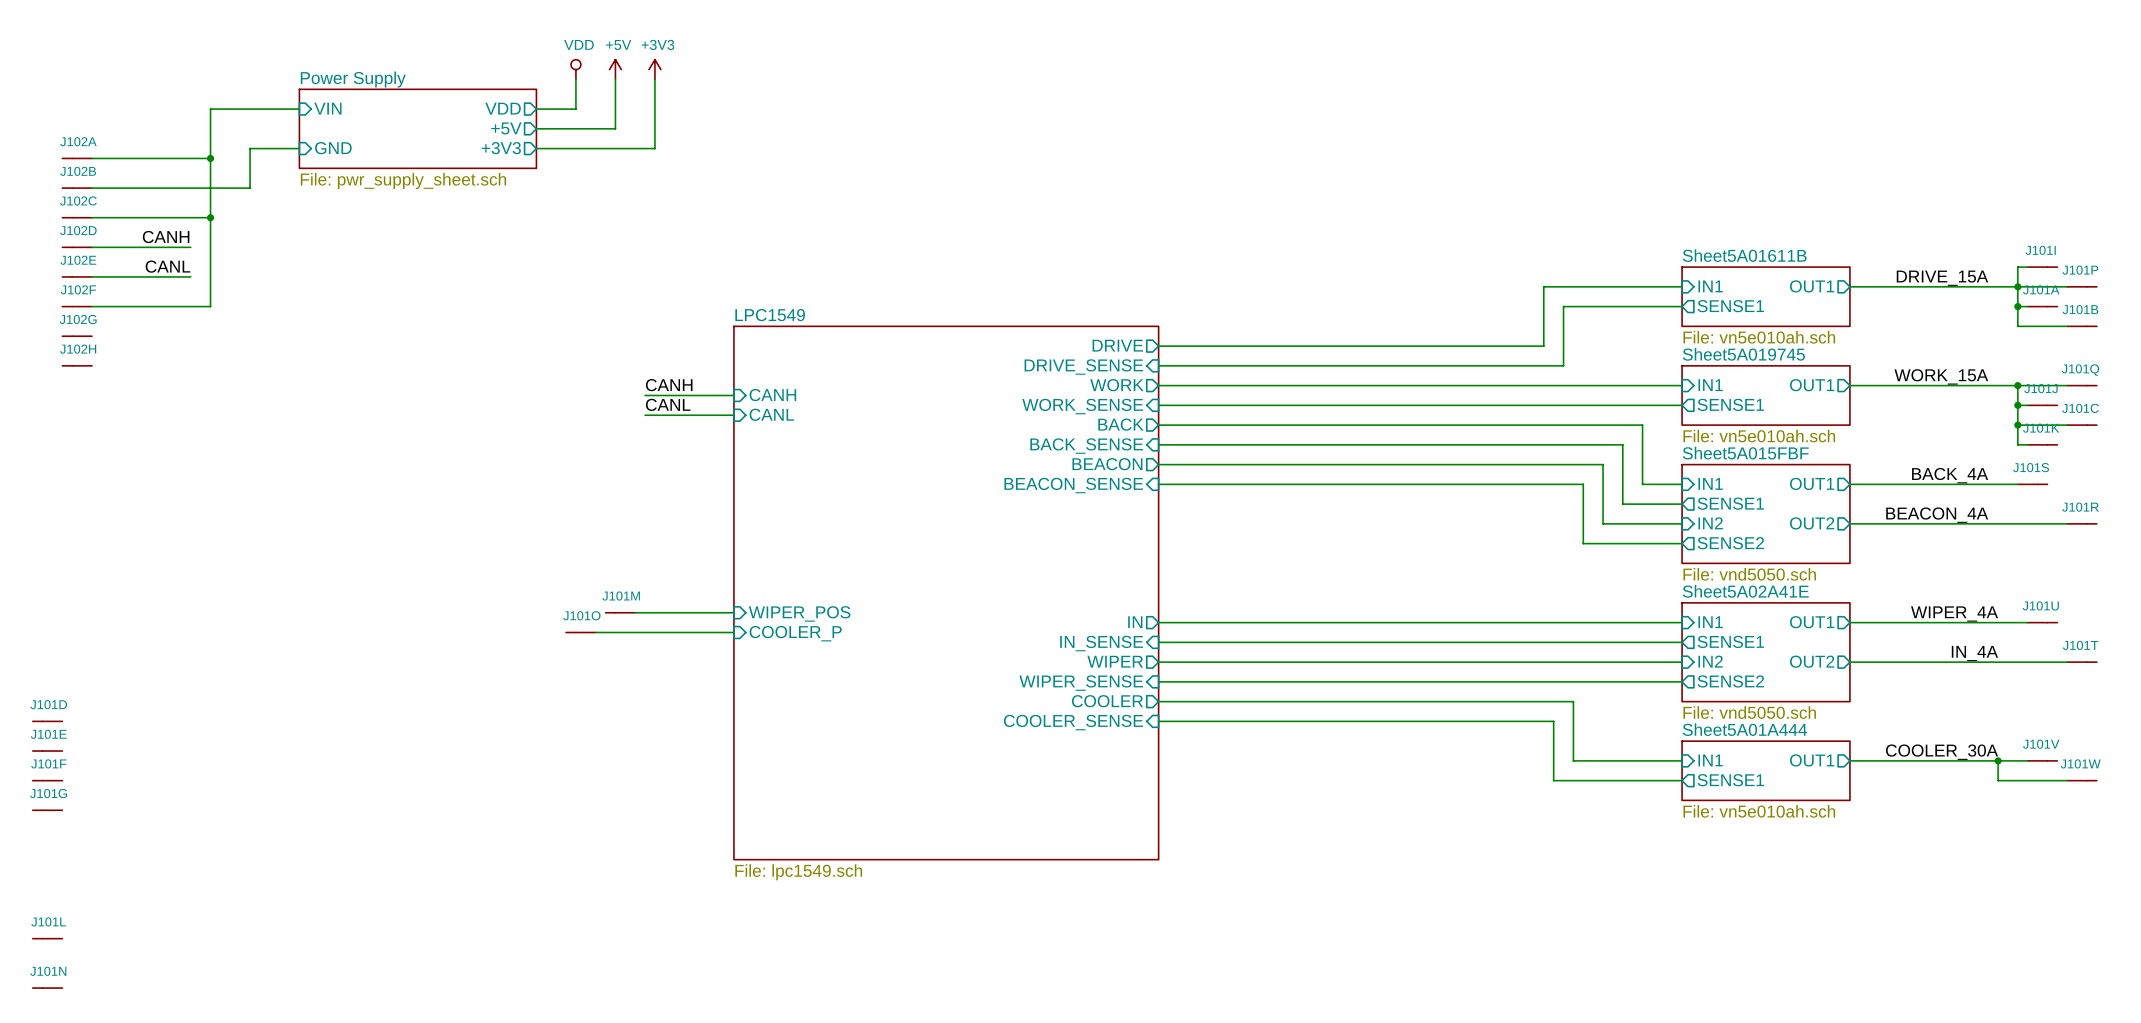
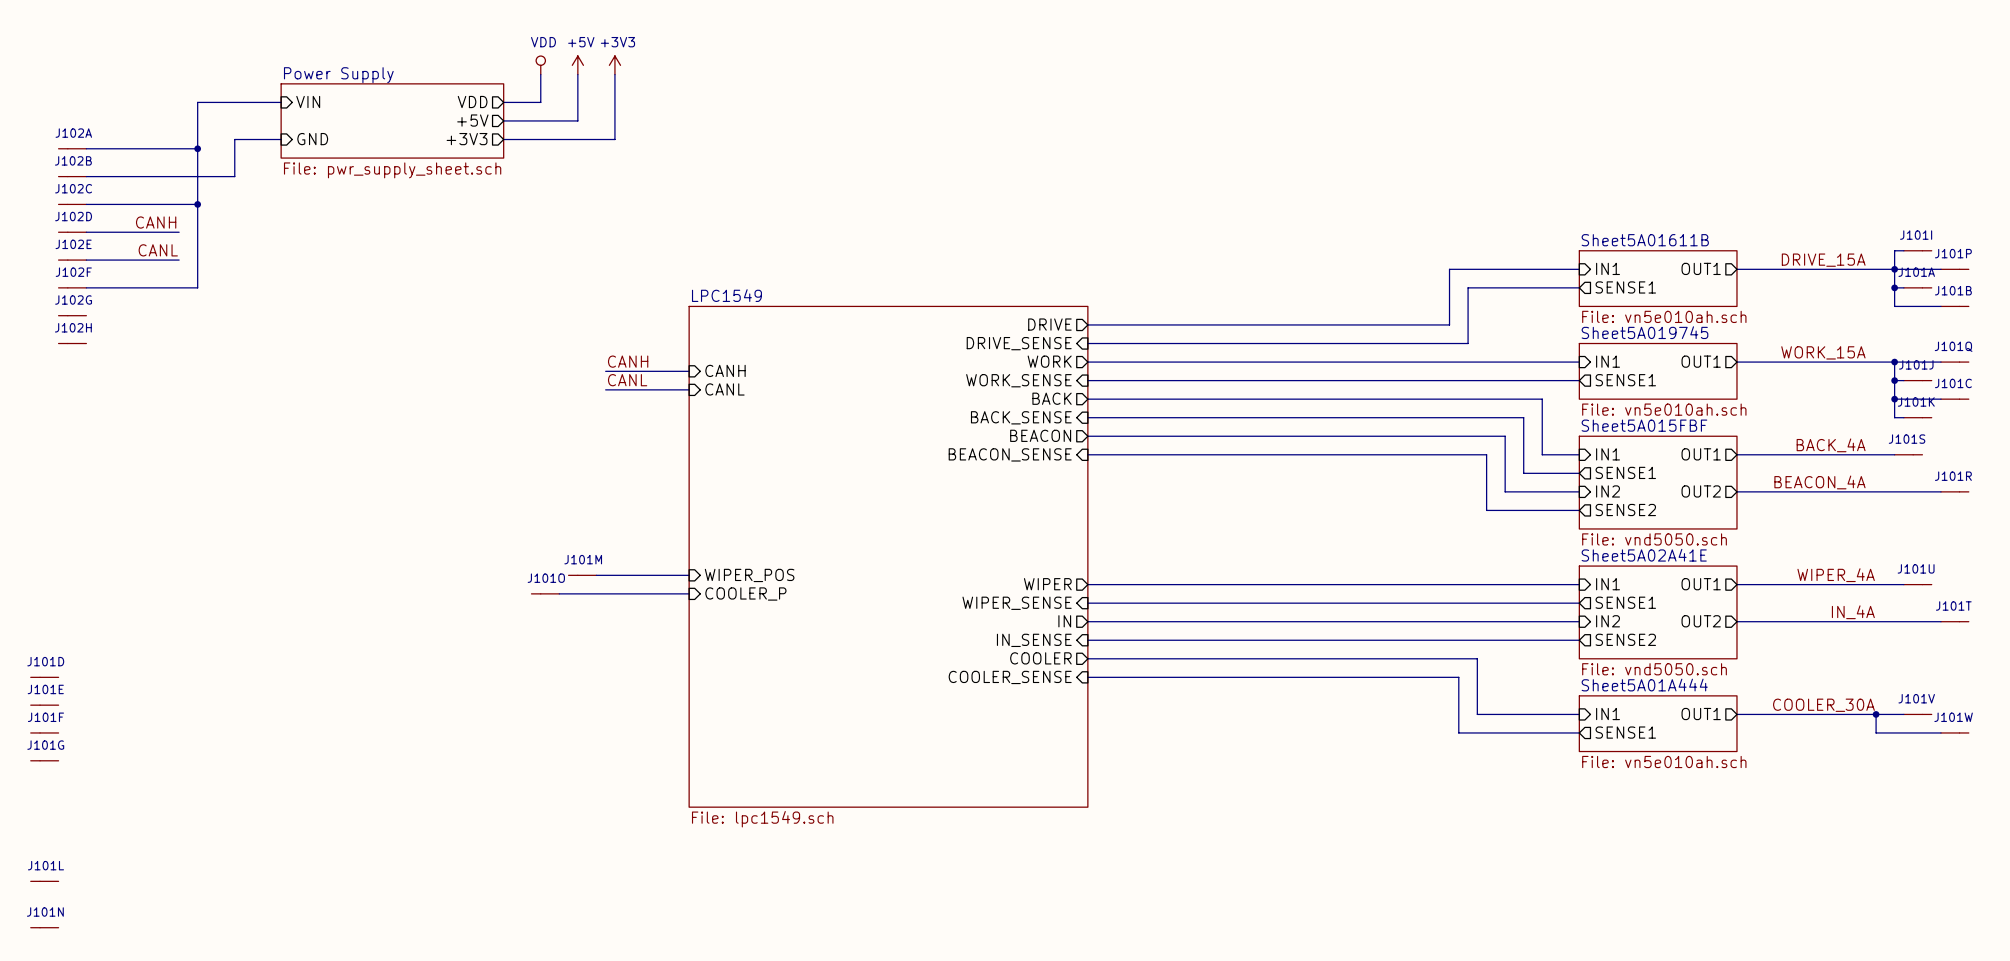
sheet pin: IN (1135, 622) -> WIPER (1047, 584)
sheet pin: IN_SENSE (1101, 643) -> WIPER_SENSE (1017, 603)
sheet pin: WIPER (1115, 661) -> IN (1064, 621)
sheet pin: WIPER_SENSE (1081, 683) -> IN_SENSE (1034, 640)

